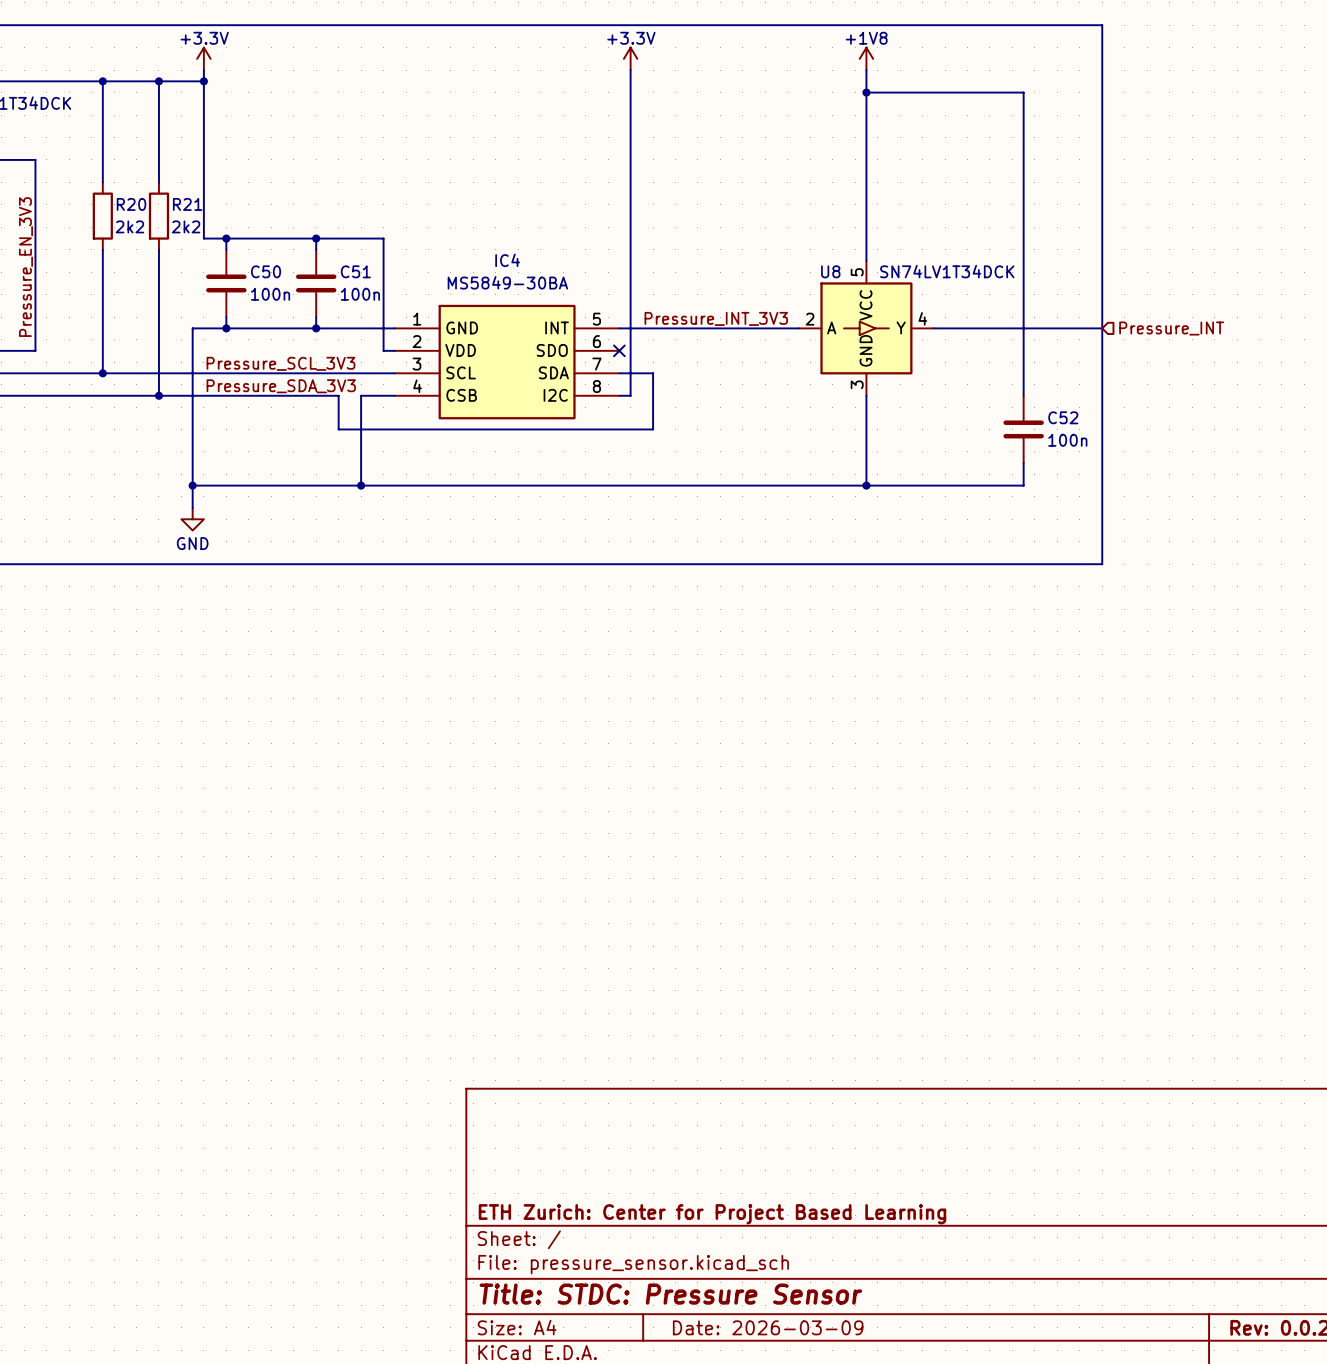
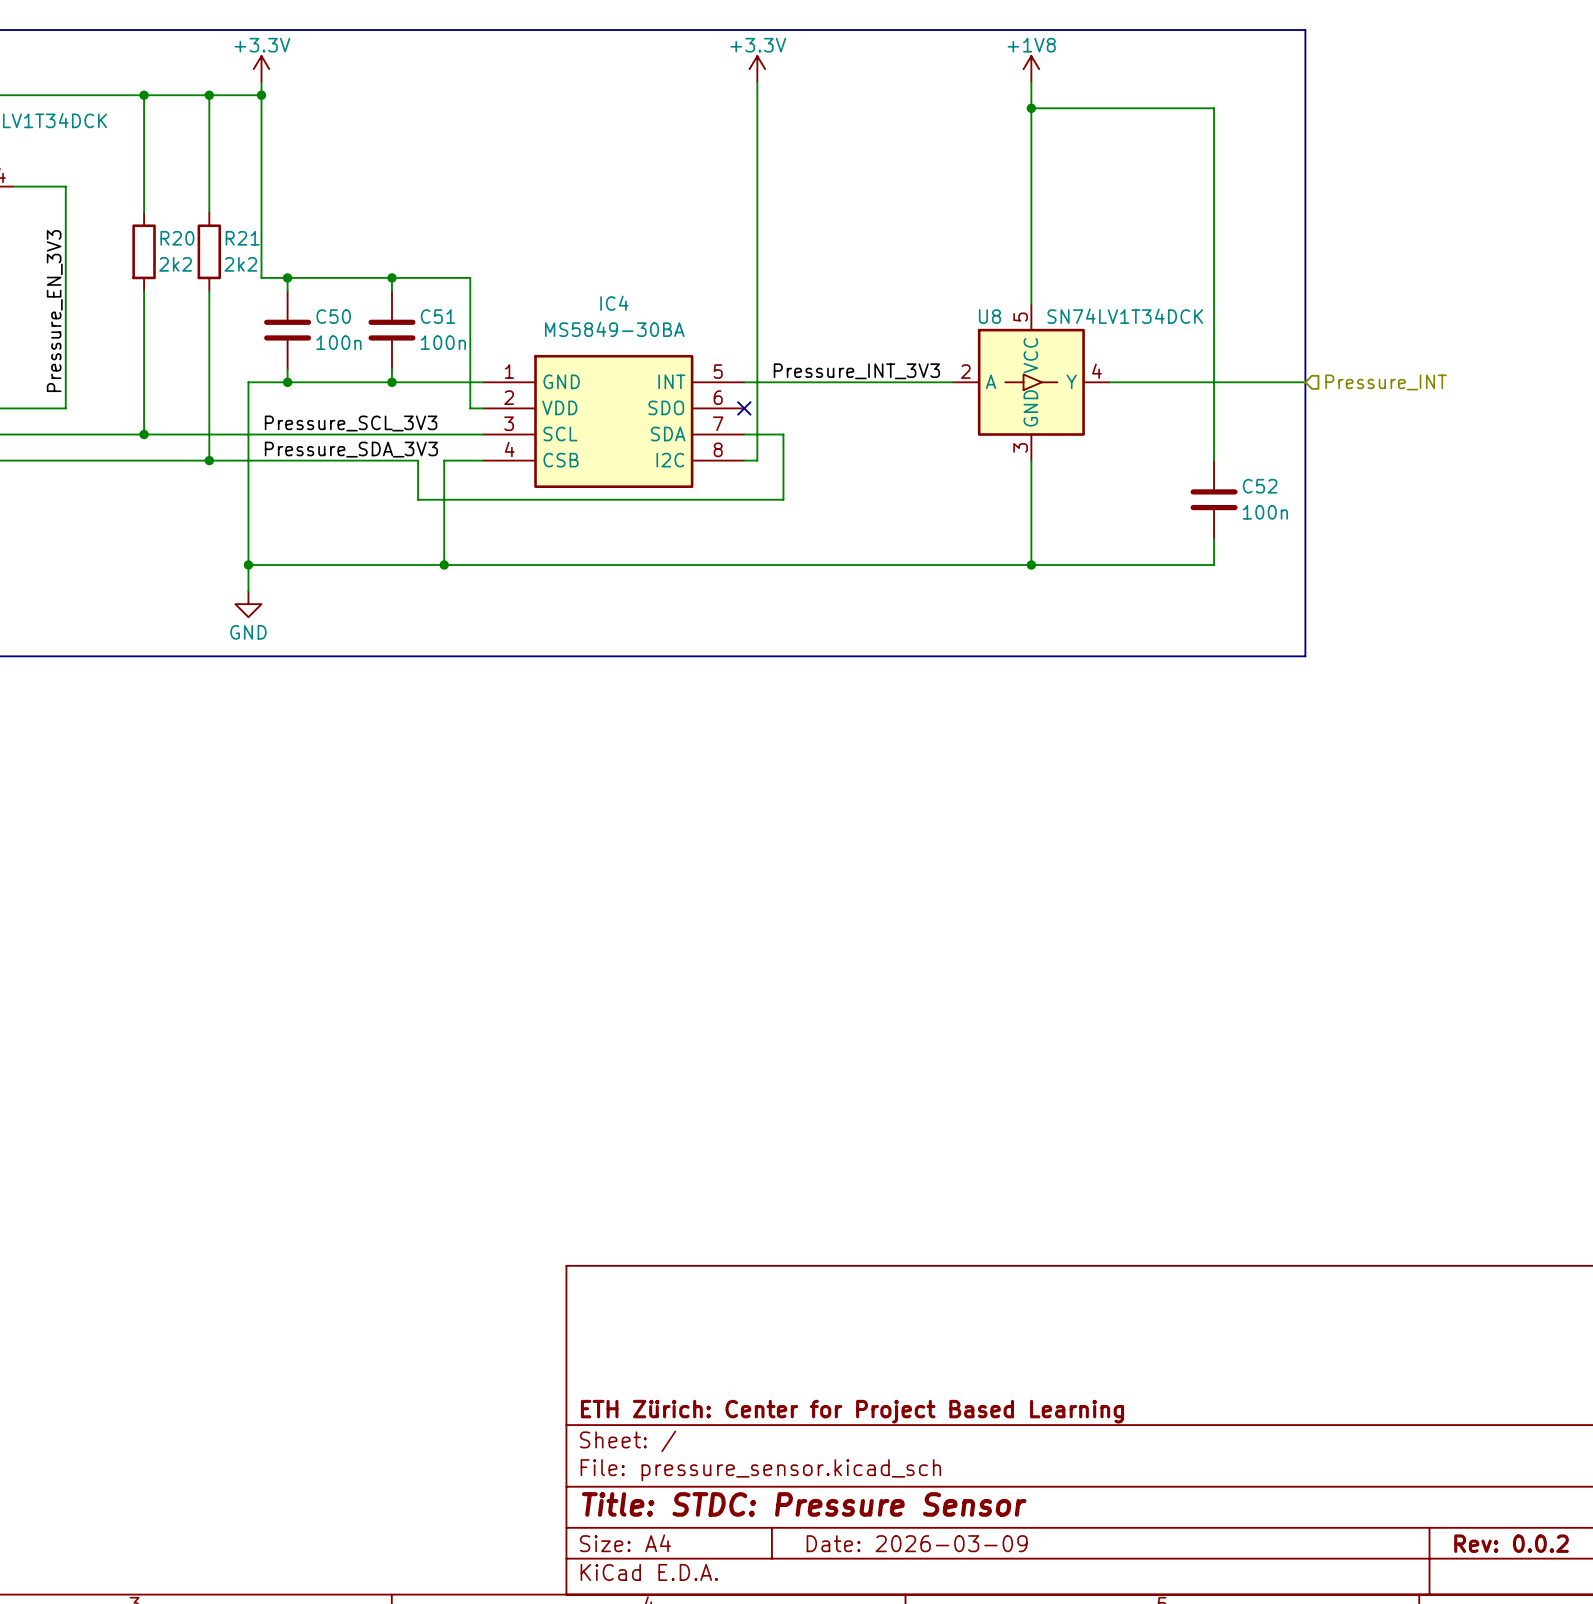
title block: ETH Zurich: Center for Project Based Learning (712, 1214) -> ETH Zürich: Center for Project Based Learning (852, 1411)

